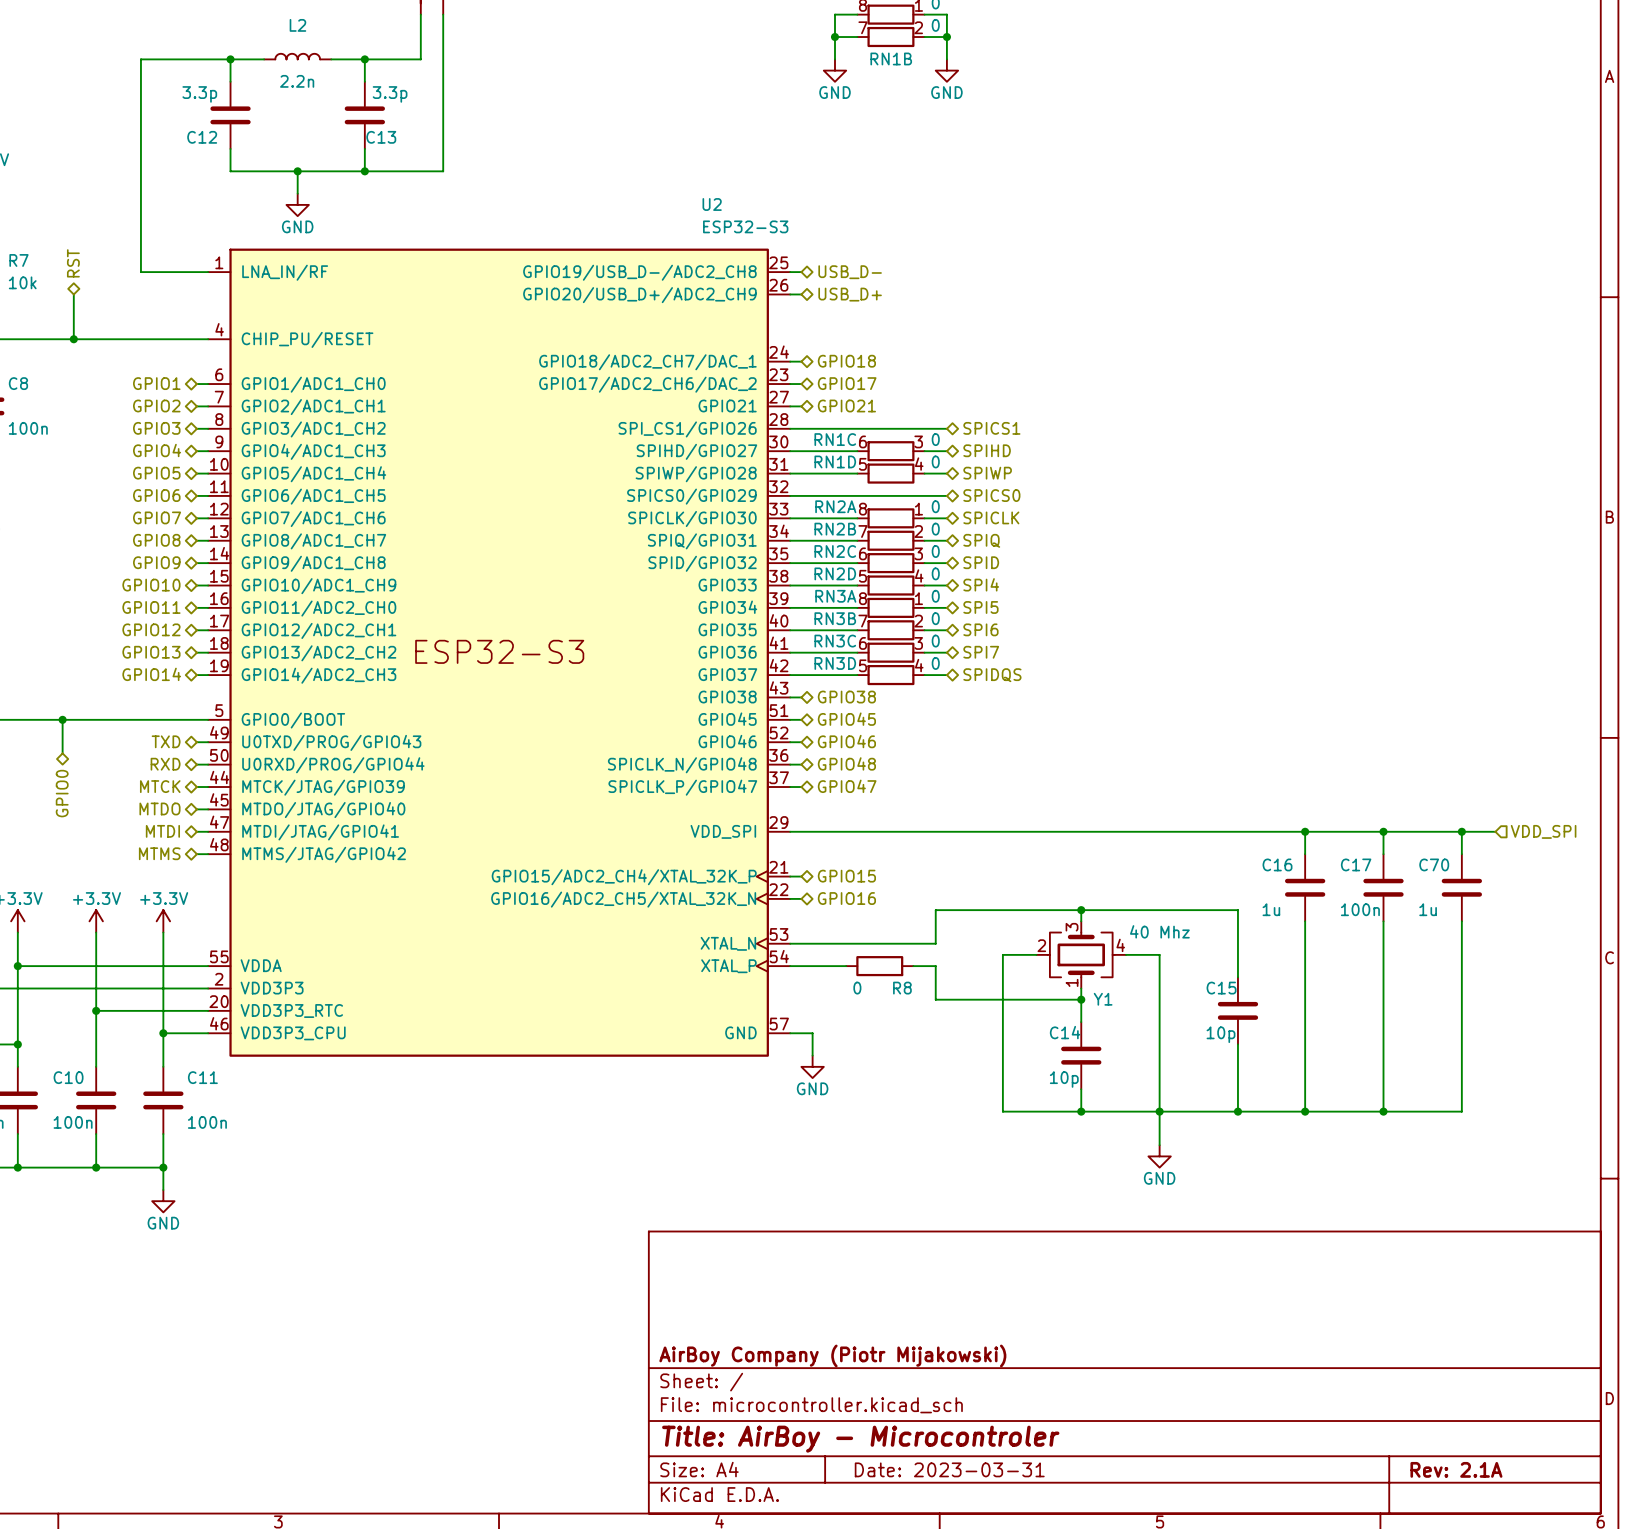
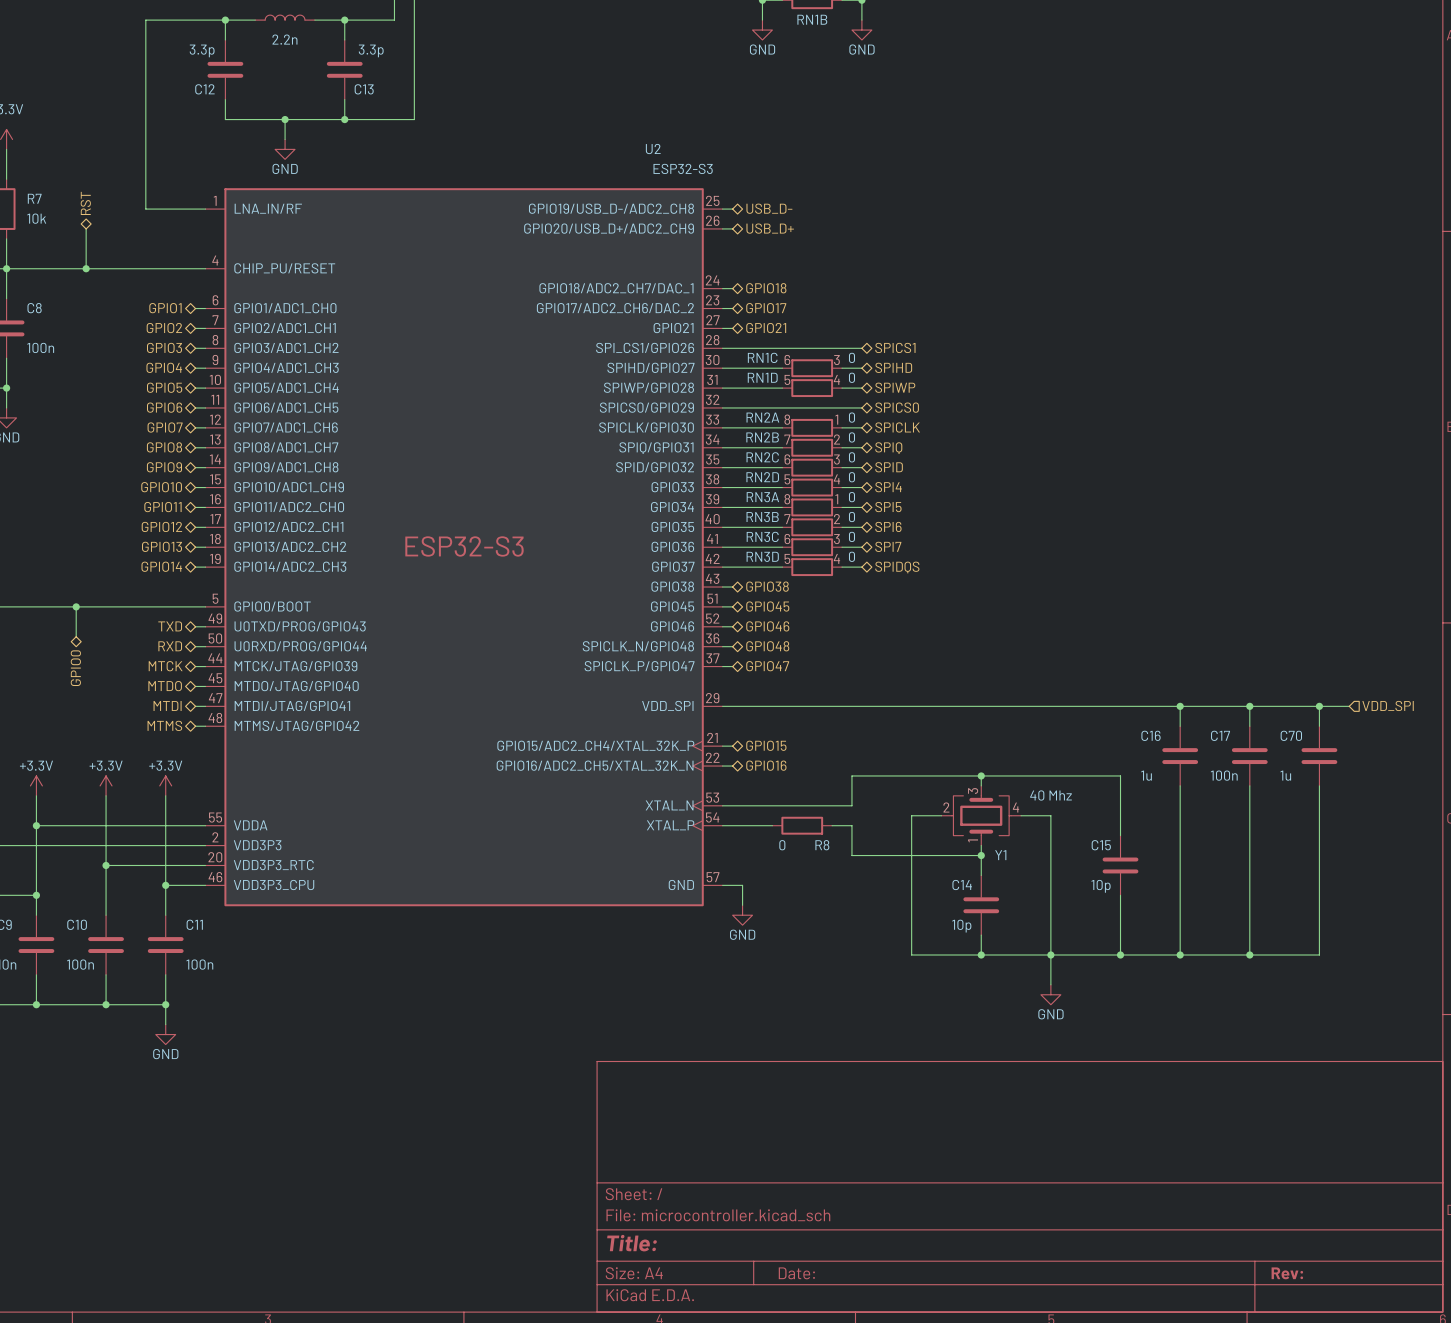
title block: AirBoy Company (Piotr Mijakowski) (832, 1355) -> none
title block: Title: AirBoy - Microcontroler (860, 1439) -> Title: (632, 1243)
title block: Date: 2023-03-31 (949, 1469) -> Date: (796, 1273)
title block: Rev: 2.1A (1456, 1469) -> Rev: (1287, 1273)

